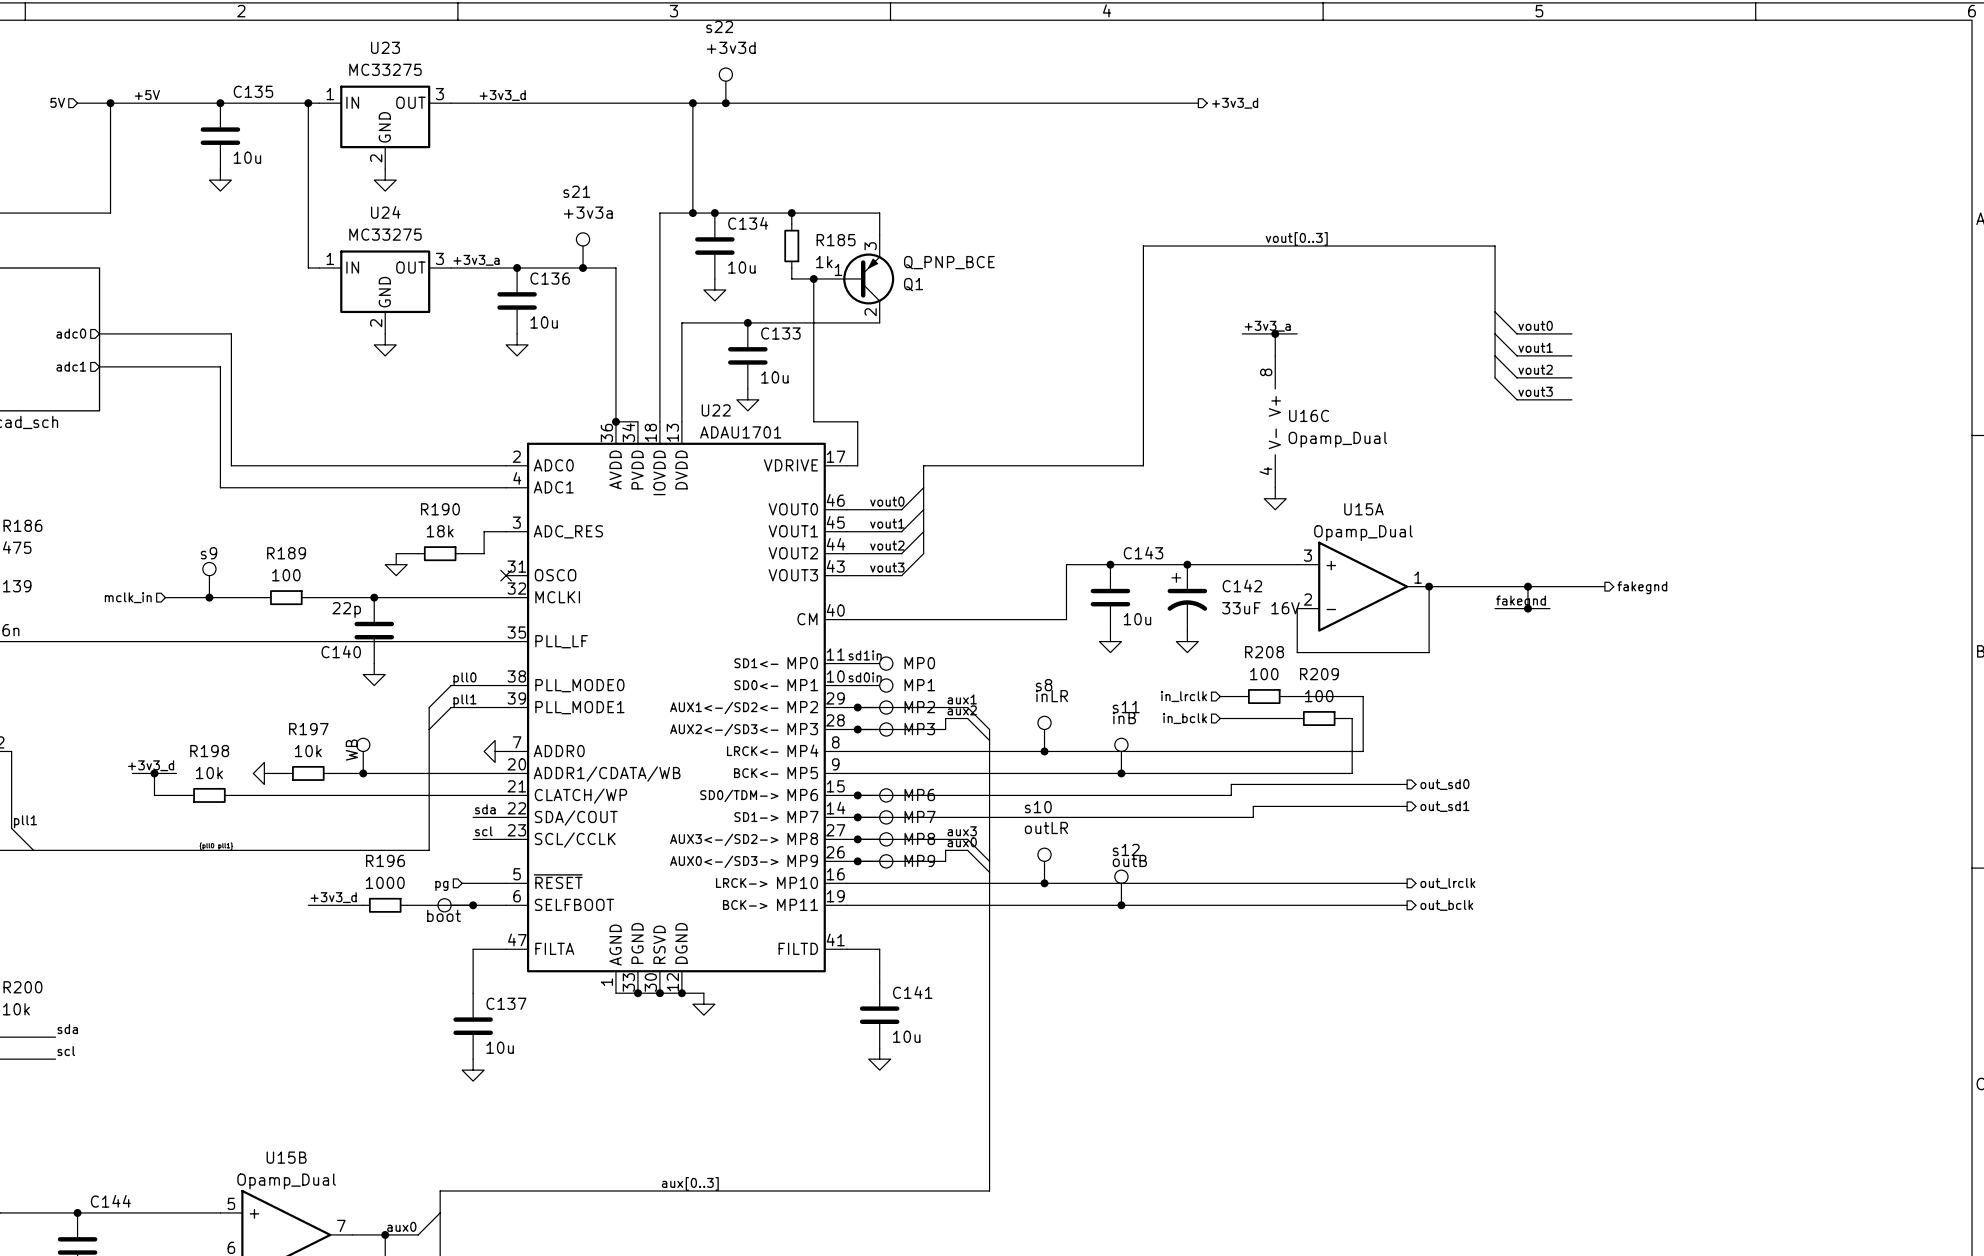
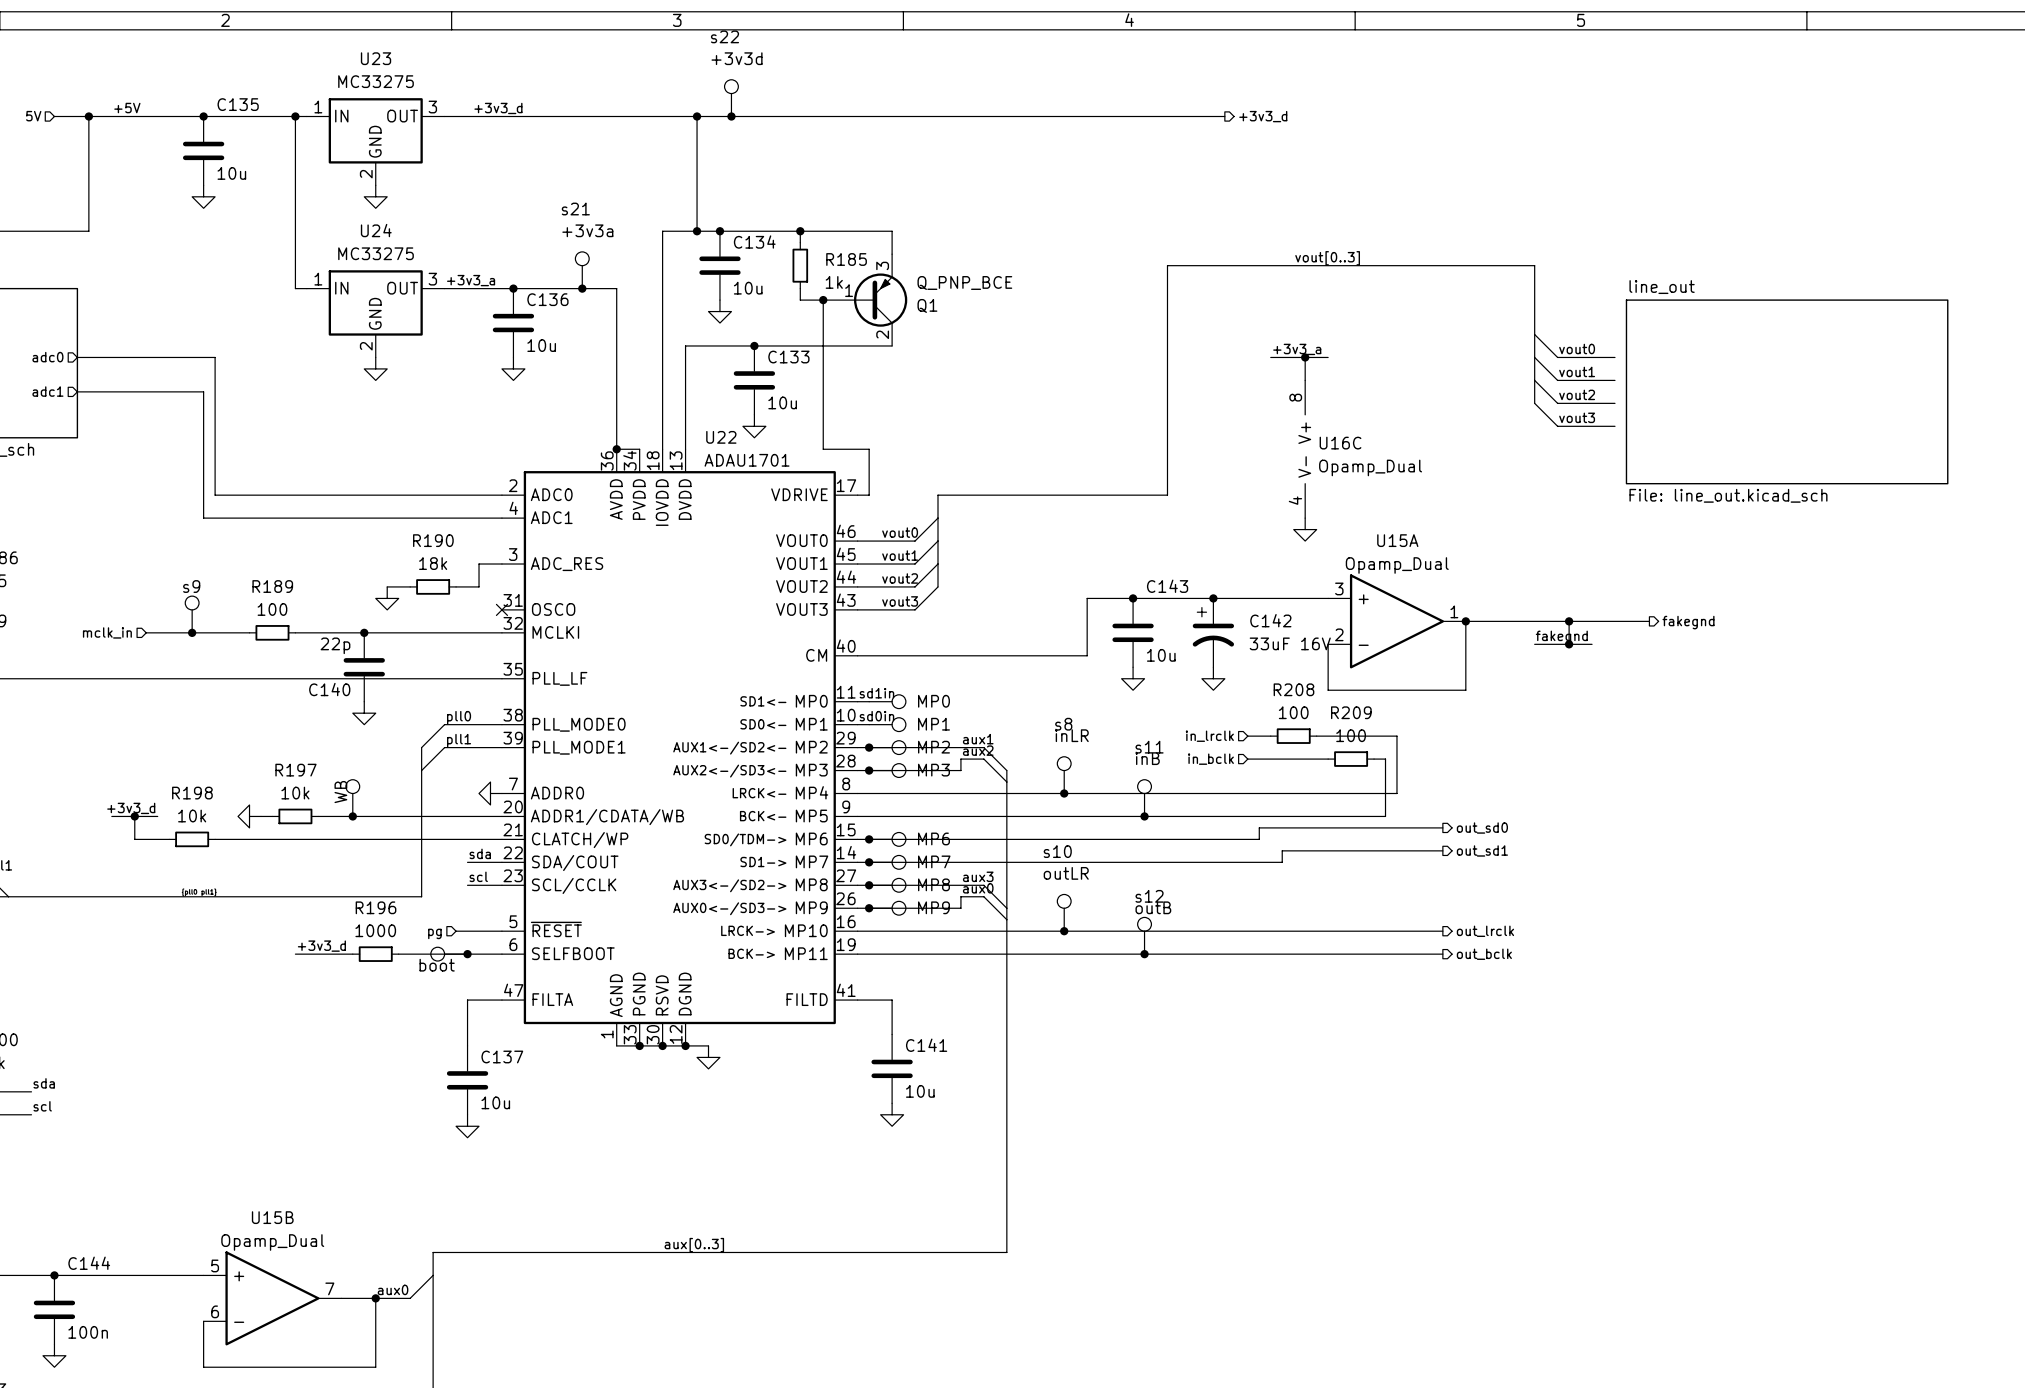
sheet line_out: none -> File: line_out.kicad_sch (1787, 391)

